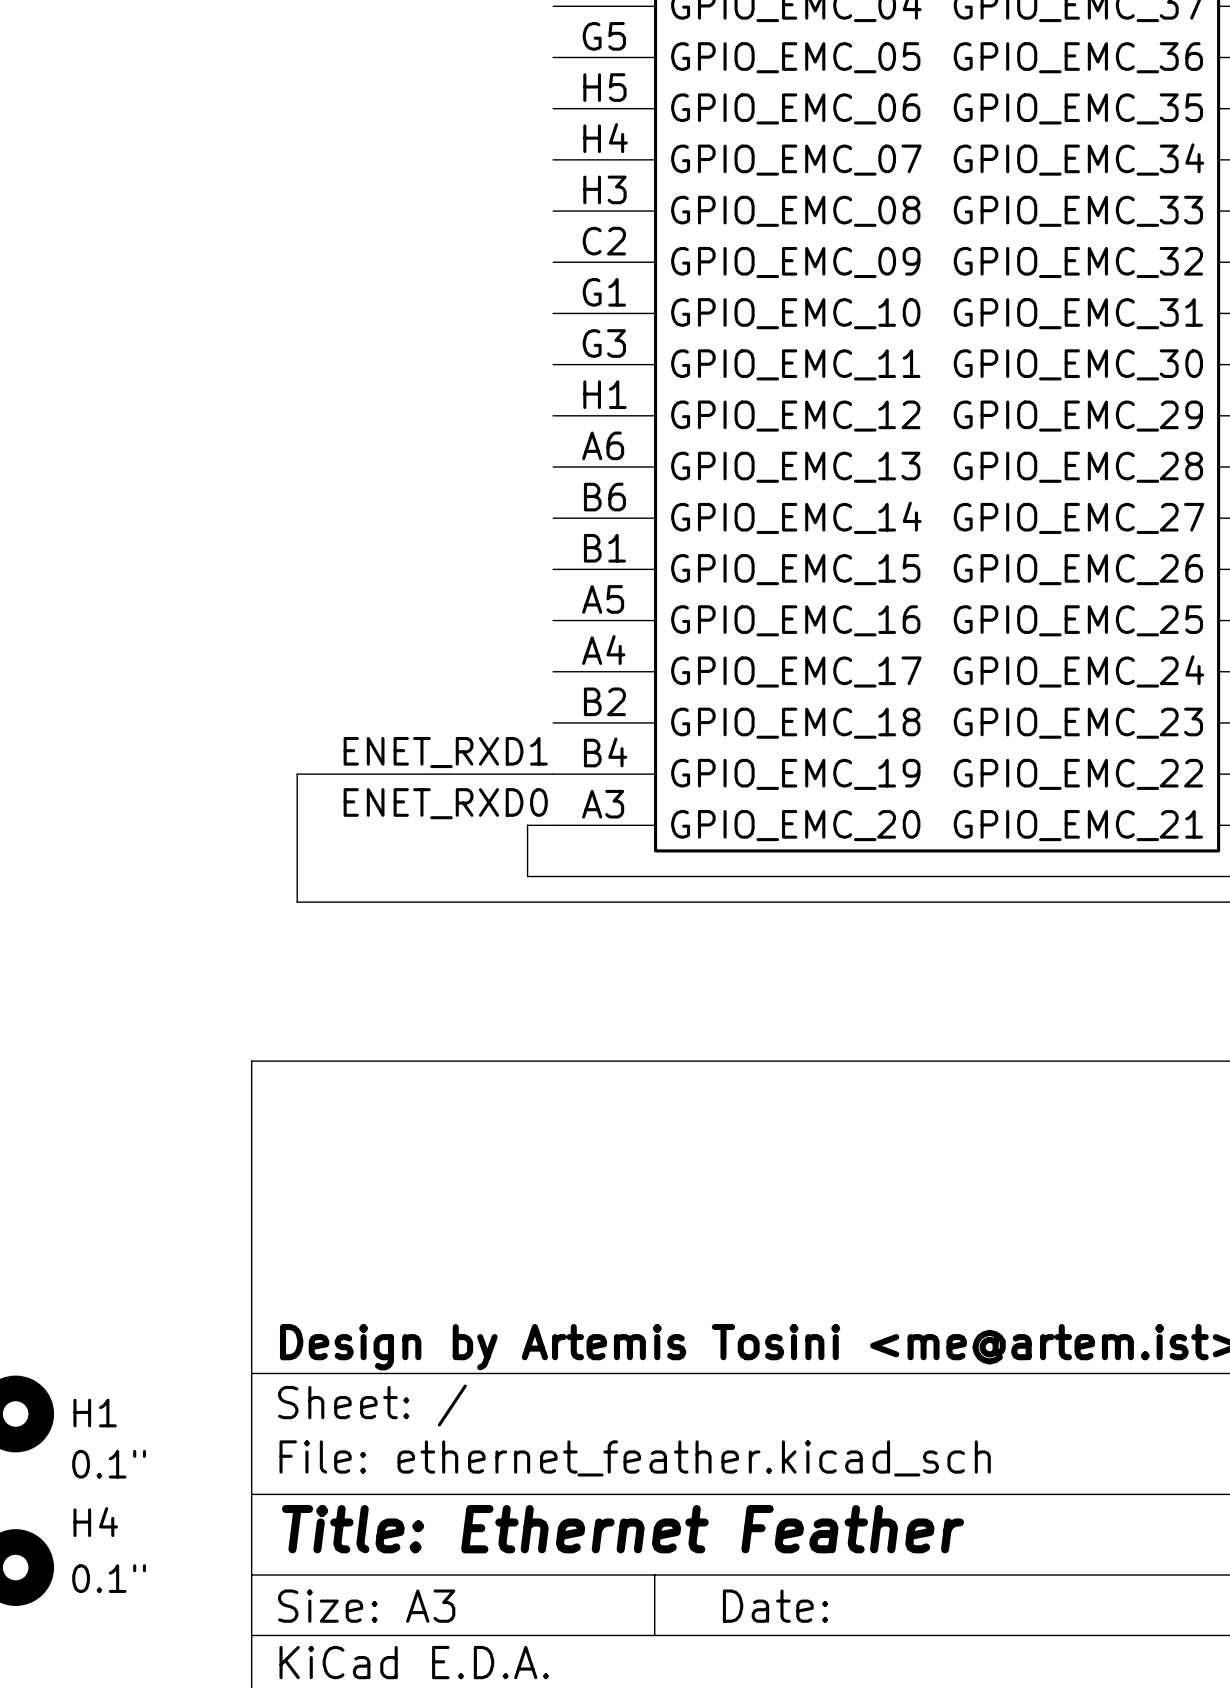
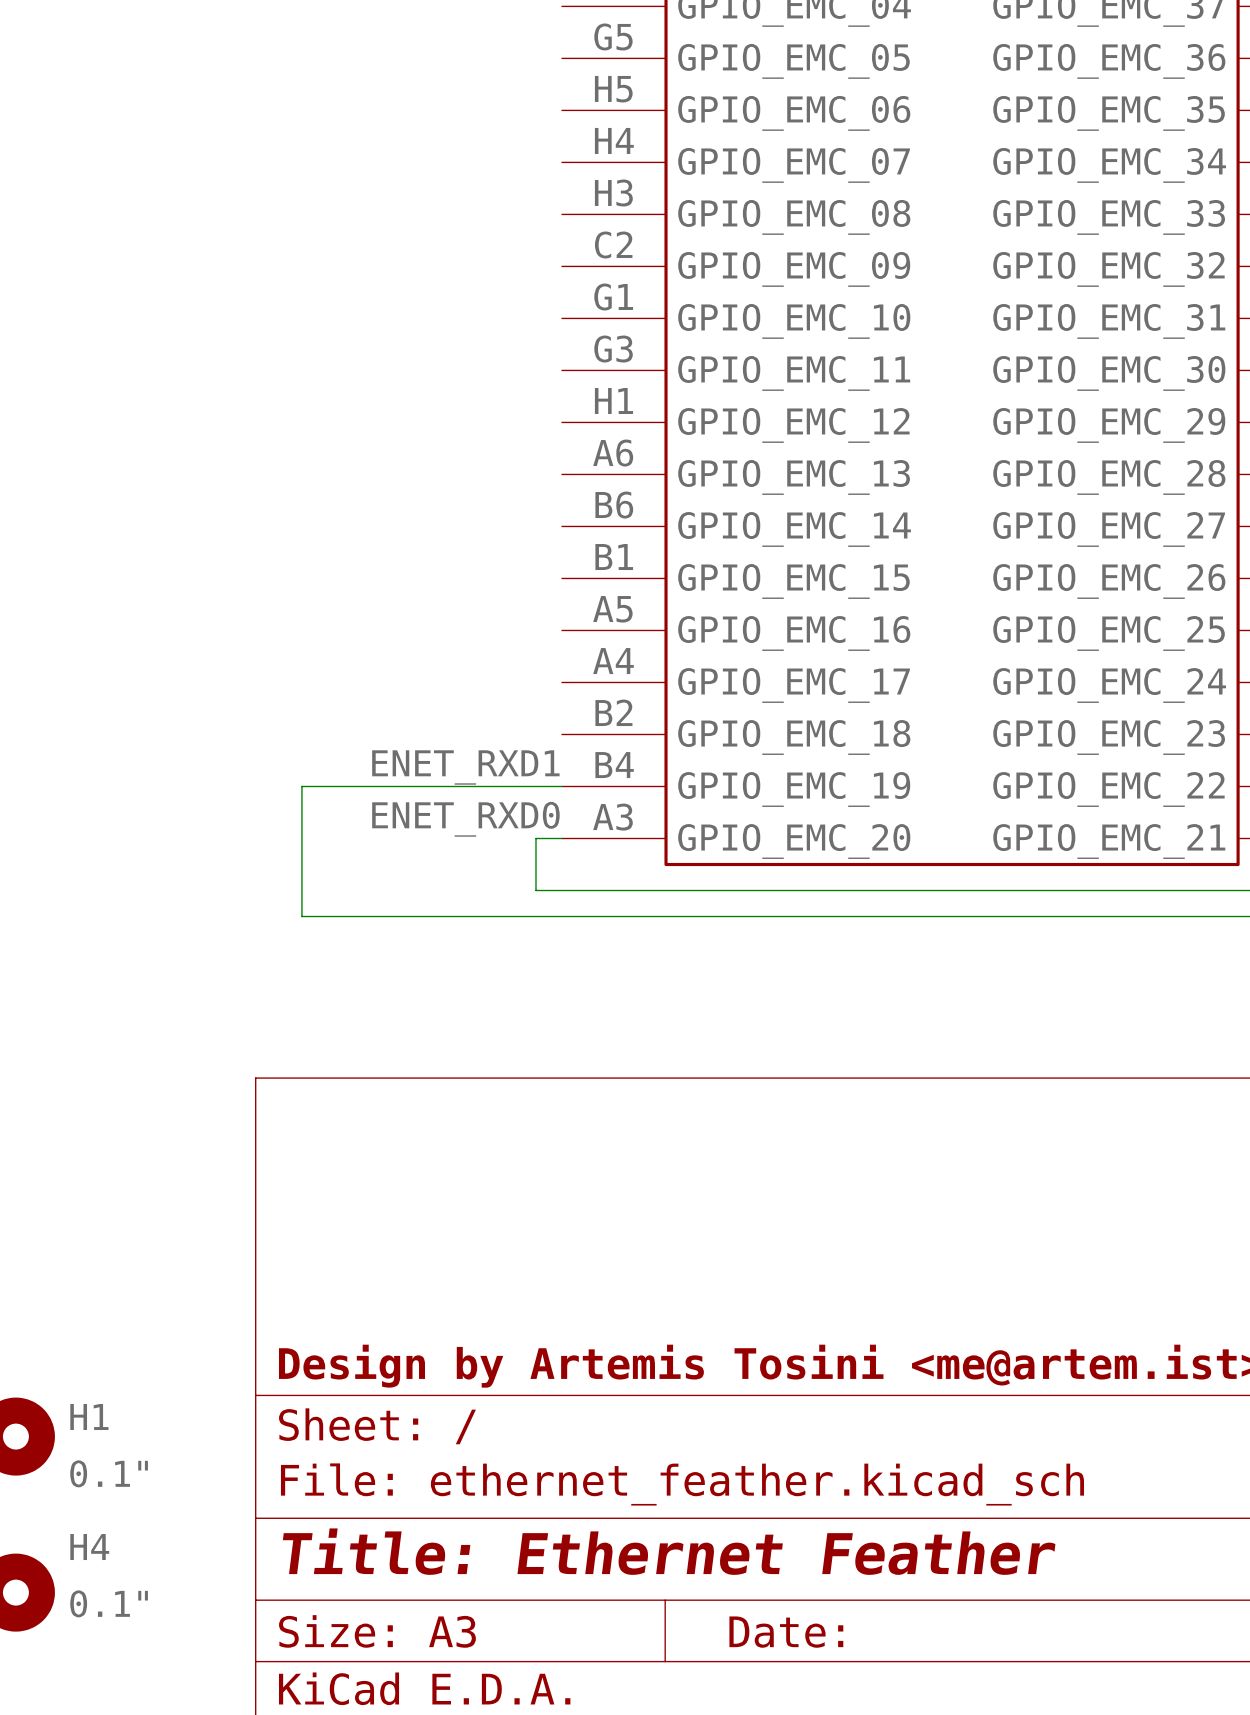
H1 name position: H1 (95, 1413) -> H1 (89, 1417)
H1 value position: 0.1" (109, 1464) -> 0.1" (109, 1473)

